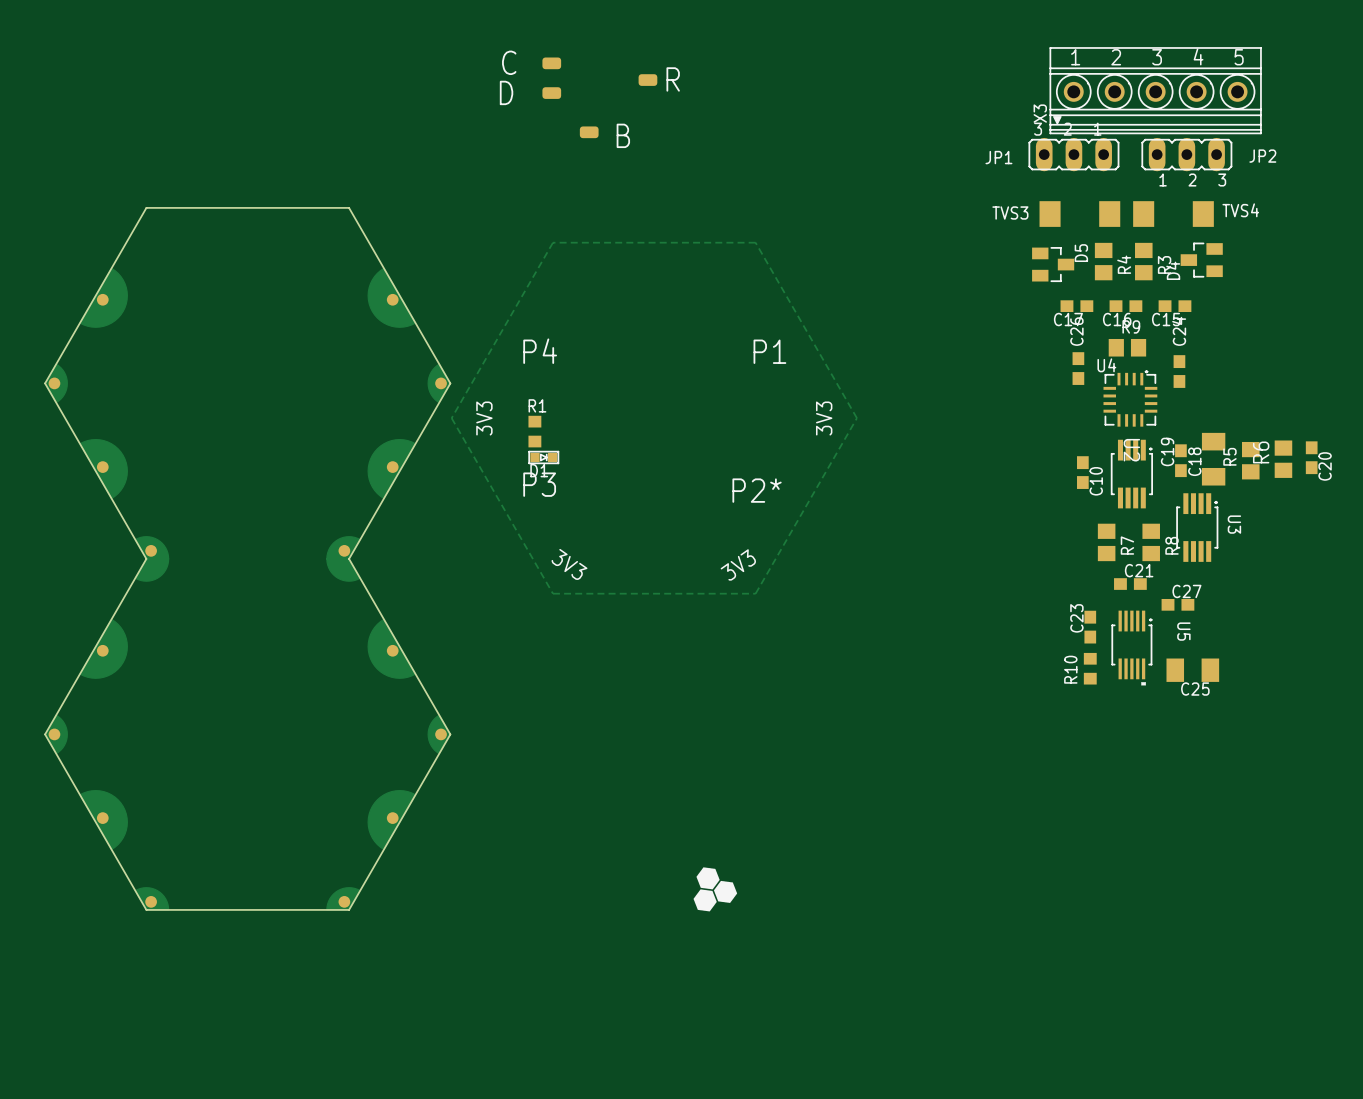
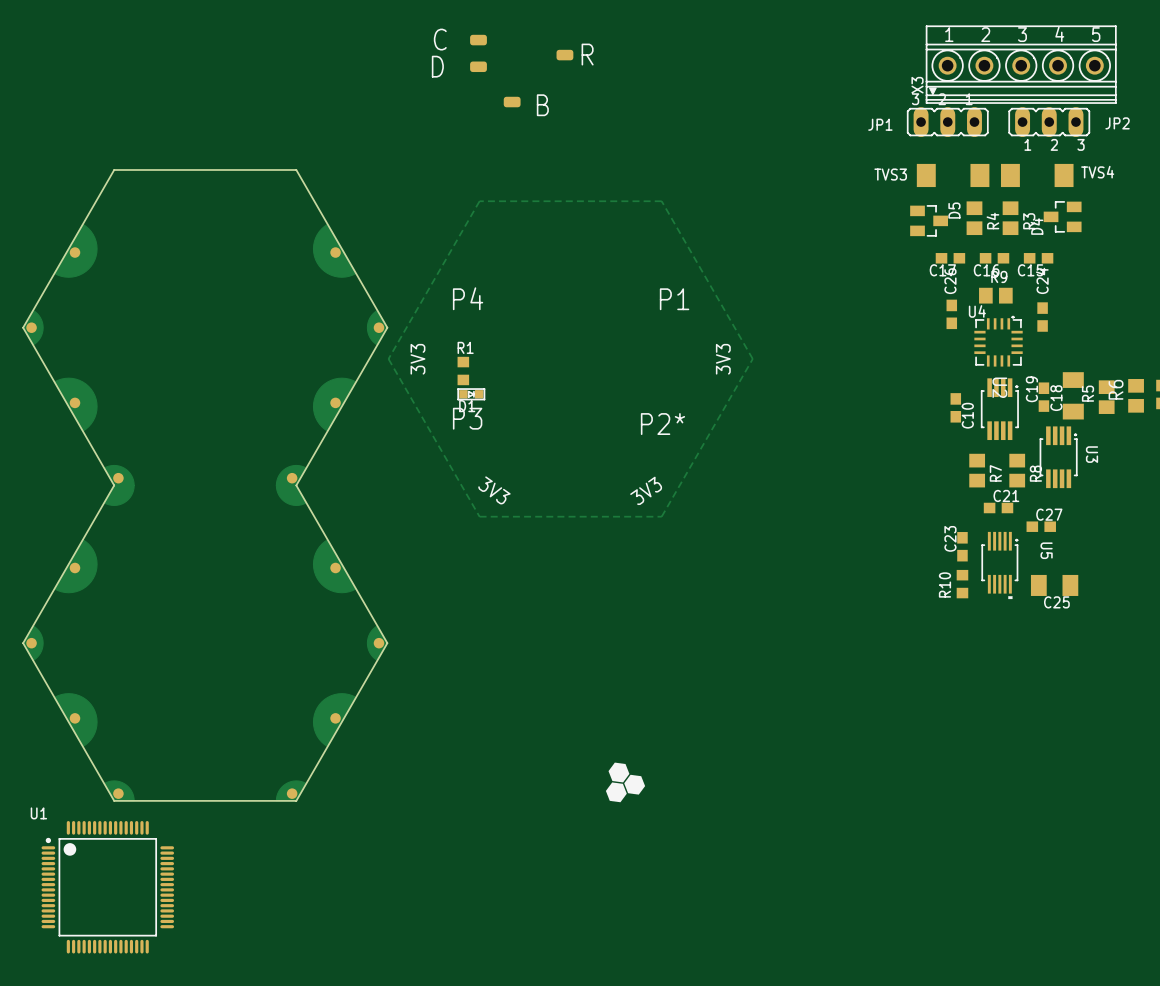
U1: none -> (107, 887)

